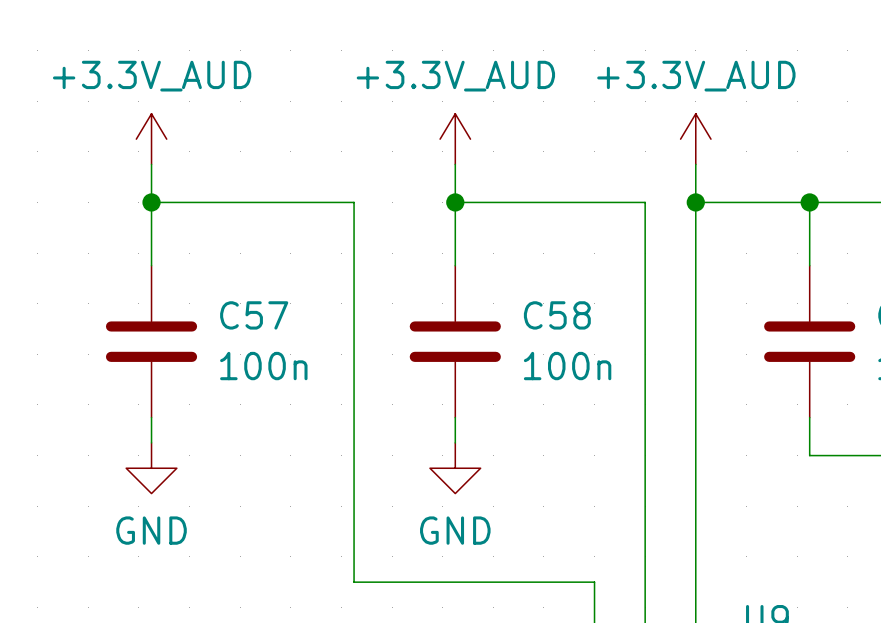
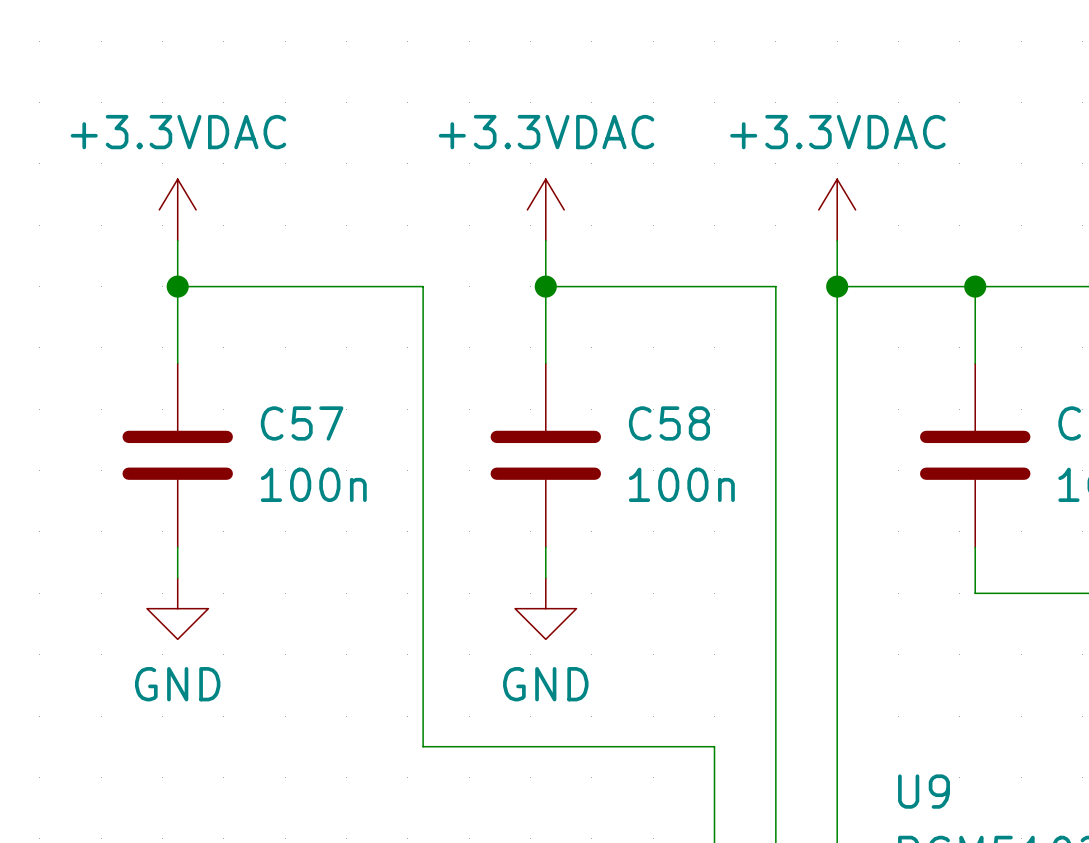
power symbol: +3.3V_AUD (151, 139) -> +3.3VDAC (177, 209)
power symbol: +3.3V_AUD (455, 139) -> +3.3VDAC (545, 209)
power symbol: +3.3V_AUD (695, 139) -> +3.3VDAC (837, 209)

